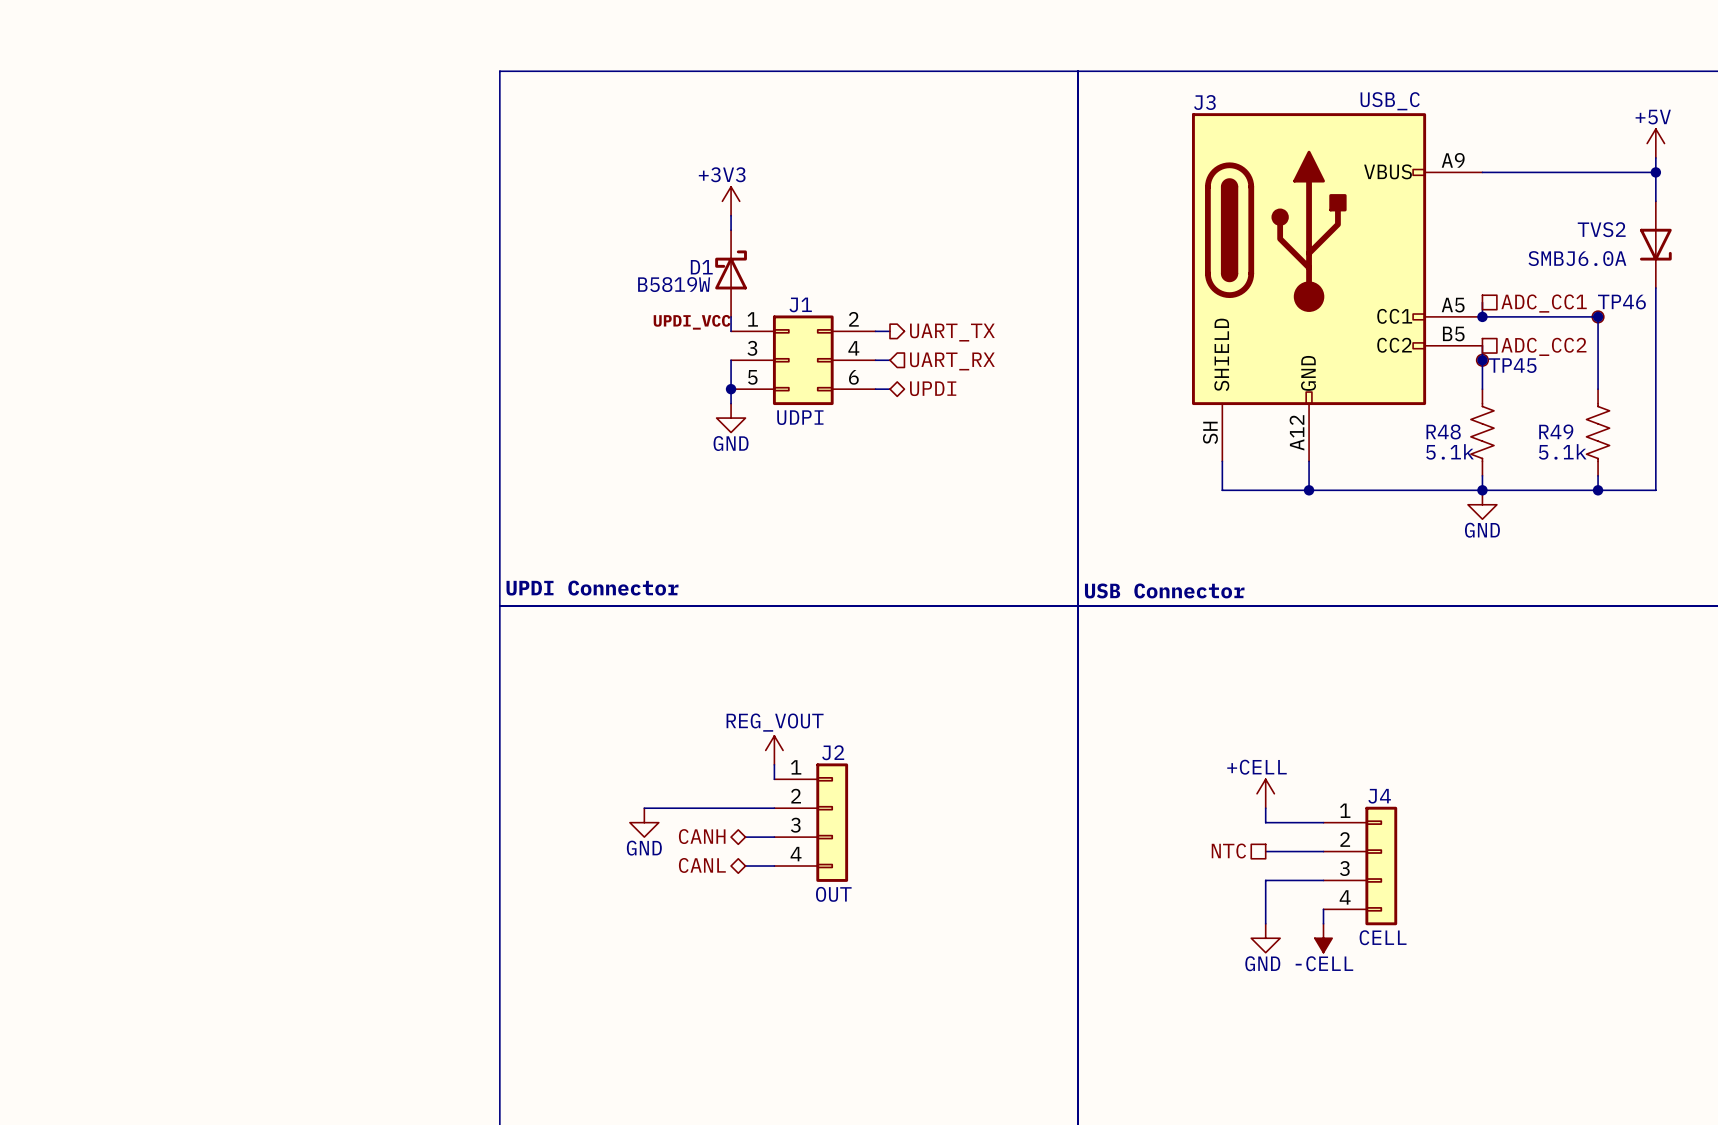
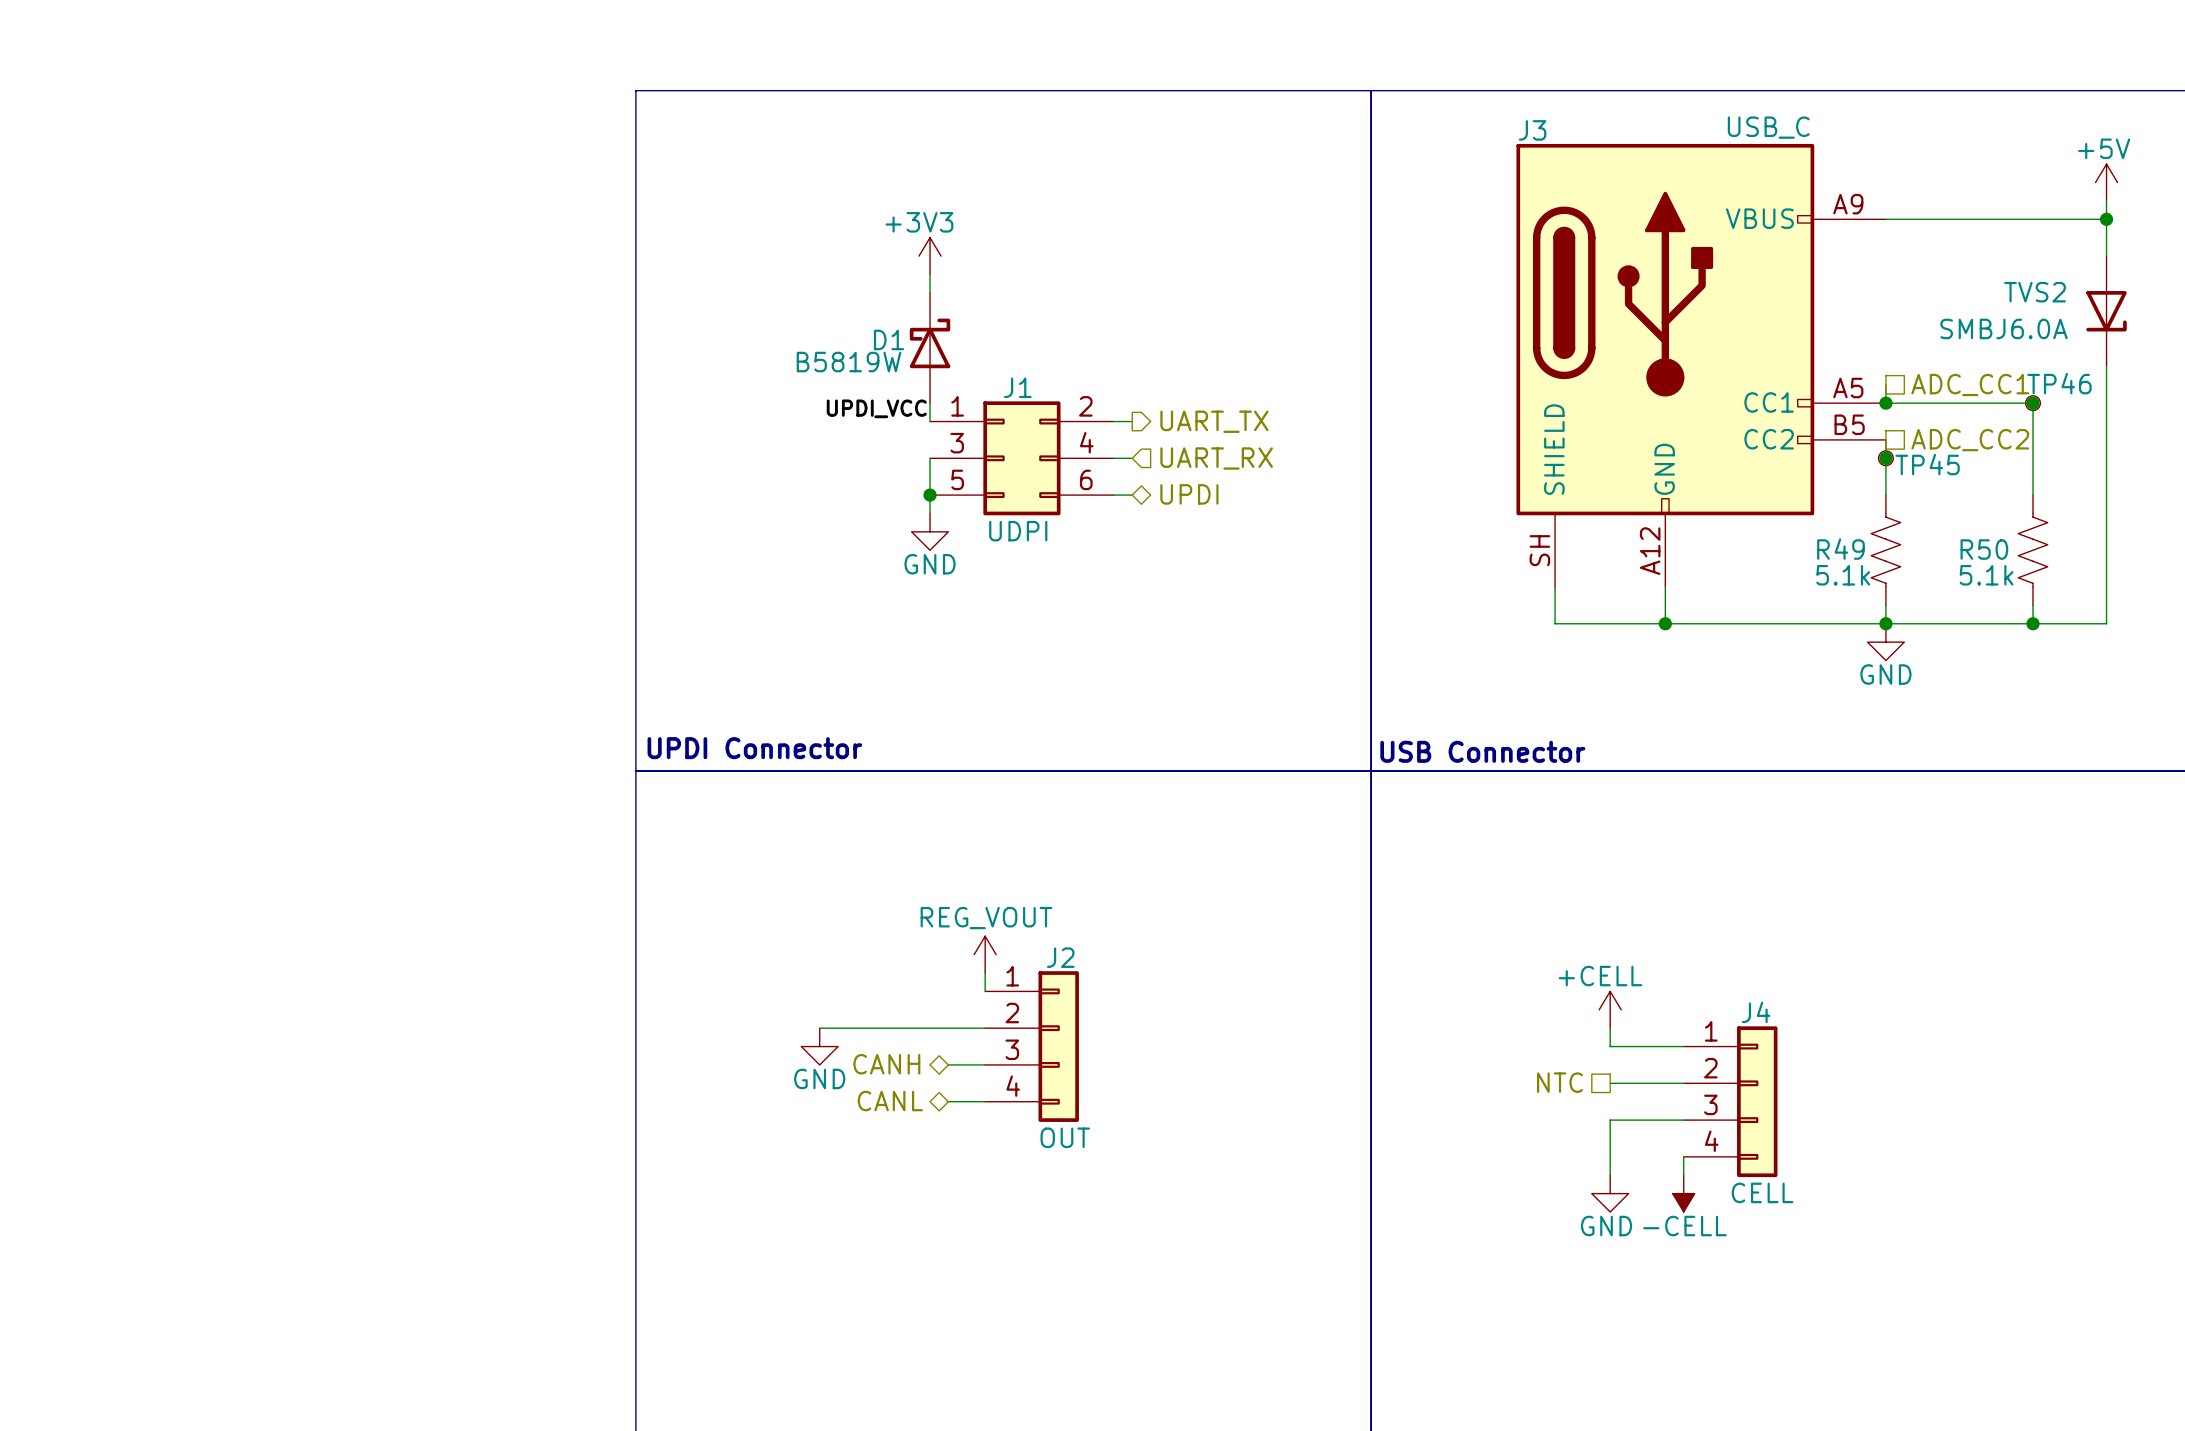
R48 name: R48 (1443, 431) -> R49 (1840, 549)
R49 name: R49 (1556, 431) -> R50 (1984, 549)

